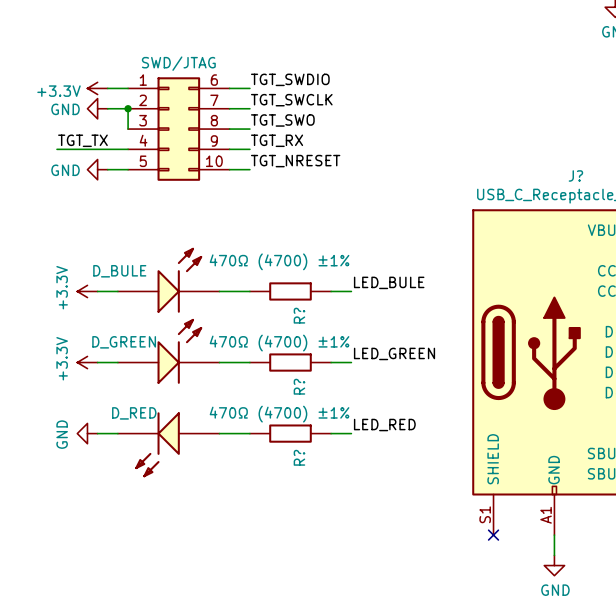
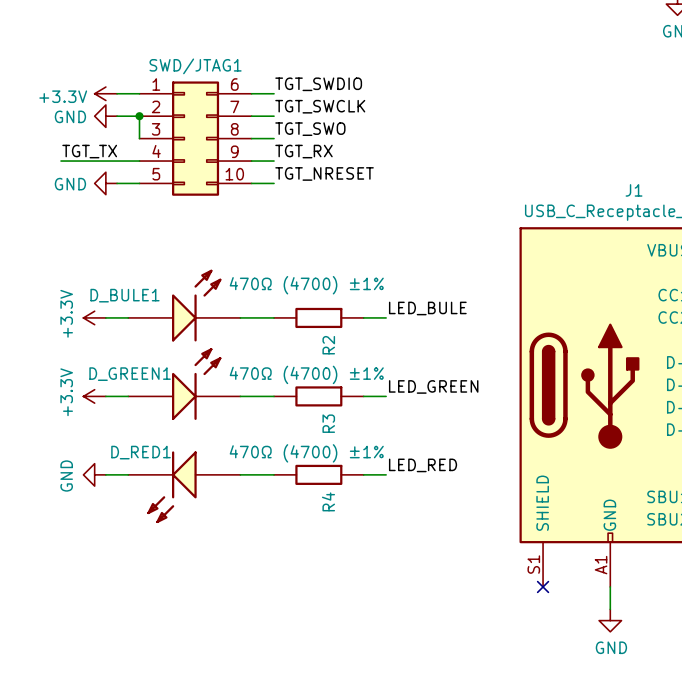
SWD/JTAG name: SWD/JTAG (178, 63) -> SWD/JTAG1 (195, 66)
J? name: J? (575, 175) -> J1 (634, 190)
D_BULE name: D_BULE (119, 271) -> D_BULE1 (125, 295)
R? name: R? (299, 315) -> R2 (328, 345)
D_GREEN name: D_GREEN (124, 342) -> D_GREEN1 (130, 374)
R? name: R? (299, 386) -> R3 (328, 423)
D_RED name: D_RED (134, 413) -> D_RED1 (141, 452)
R? name: R? (299, 457) -> R4 (328, 501)

